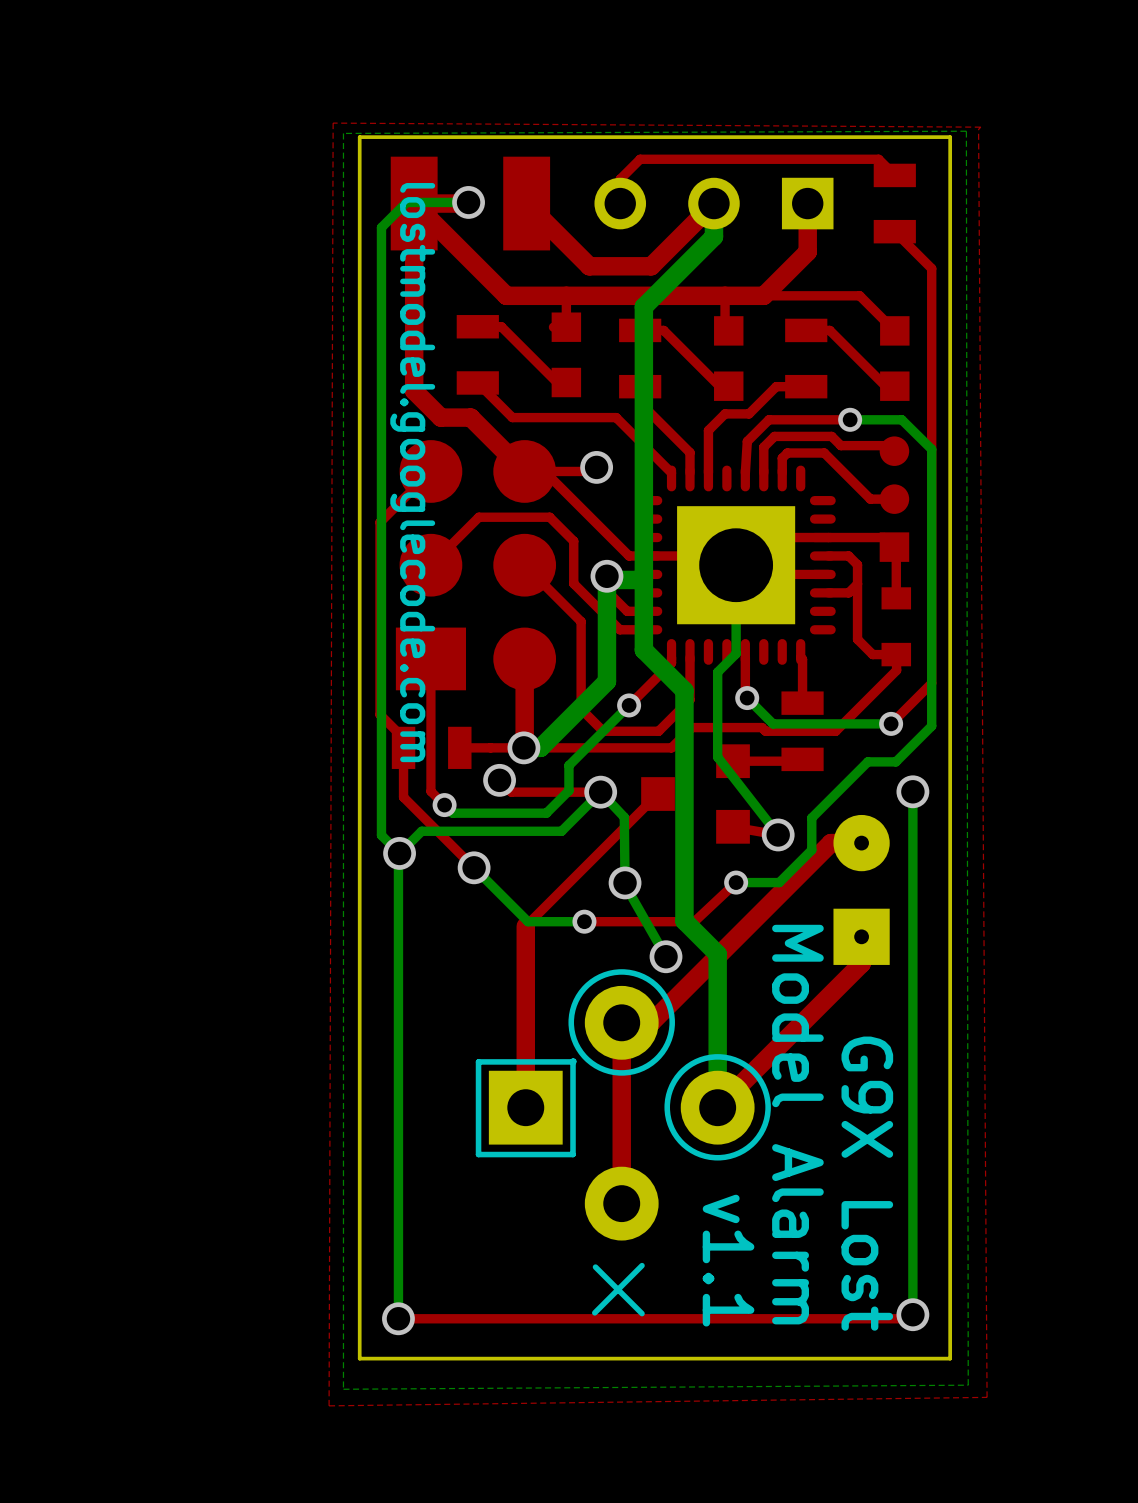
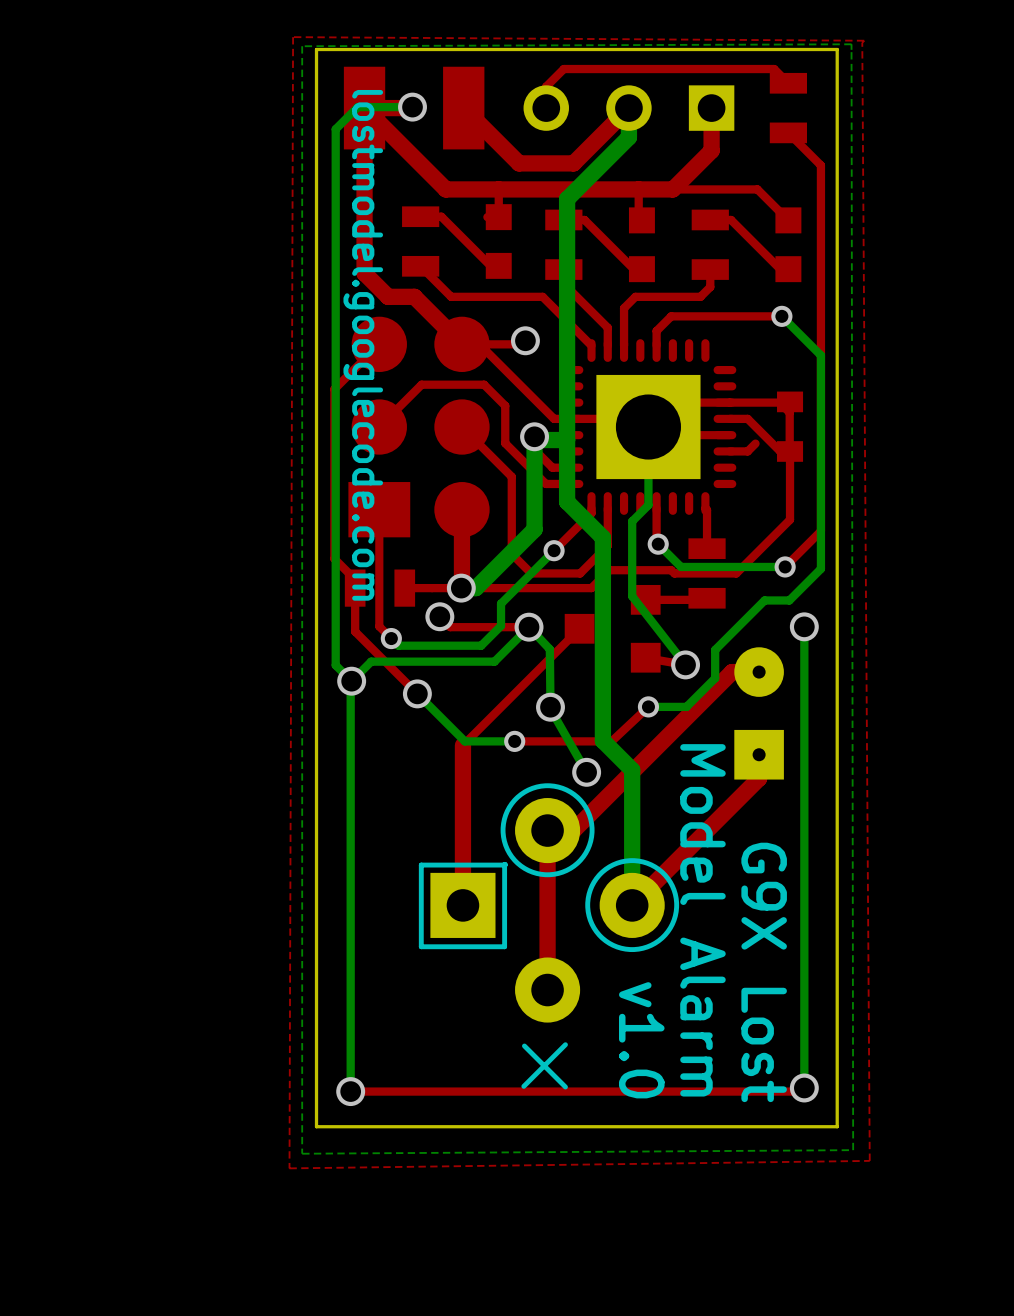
top track: (806, 386) (776, 386) (749, 413) (725, 413) (721, 417) -> (710, 269) (710, 287) (700, 296) (635, 296)
top track: (850, 419) (768, 419) (747, 441) (745, 472) -> (781, 316) (671, 316) (656, 331) (656, 345)
bottom track: (850, 419) (901, 419) (931, 449) (931, 484) -> (781, 316) (820, 355)
via position: (850, 419) -> (781, 316)
top track: (894, 451) (888, 445) (840, 445) (831, 436) (774, 436) (763, 447) (763, 472) -> none
top track: (782, 472) (782, 458) (787, 453) (824, 453) (870, 499) (894, 499) -> none
part: (894, 499) -> none
top track: (857, 564) (857, 639) (872, 654) (896, 654) (896, 670) -> (755, 426) (780, 451) (790, 451) (790, 519)
part position: (896, 626) -> (790, 426)
text: v1.1 (728, 1260) -> v1.0 (641, 1040)

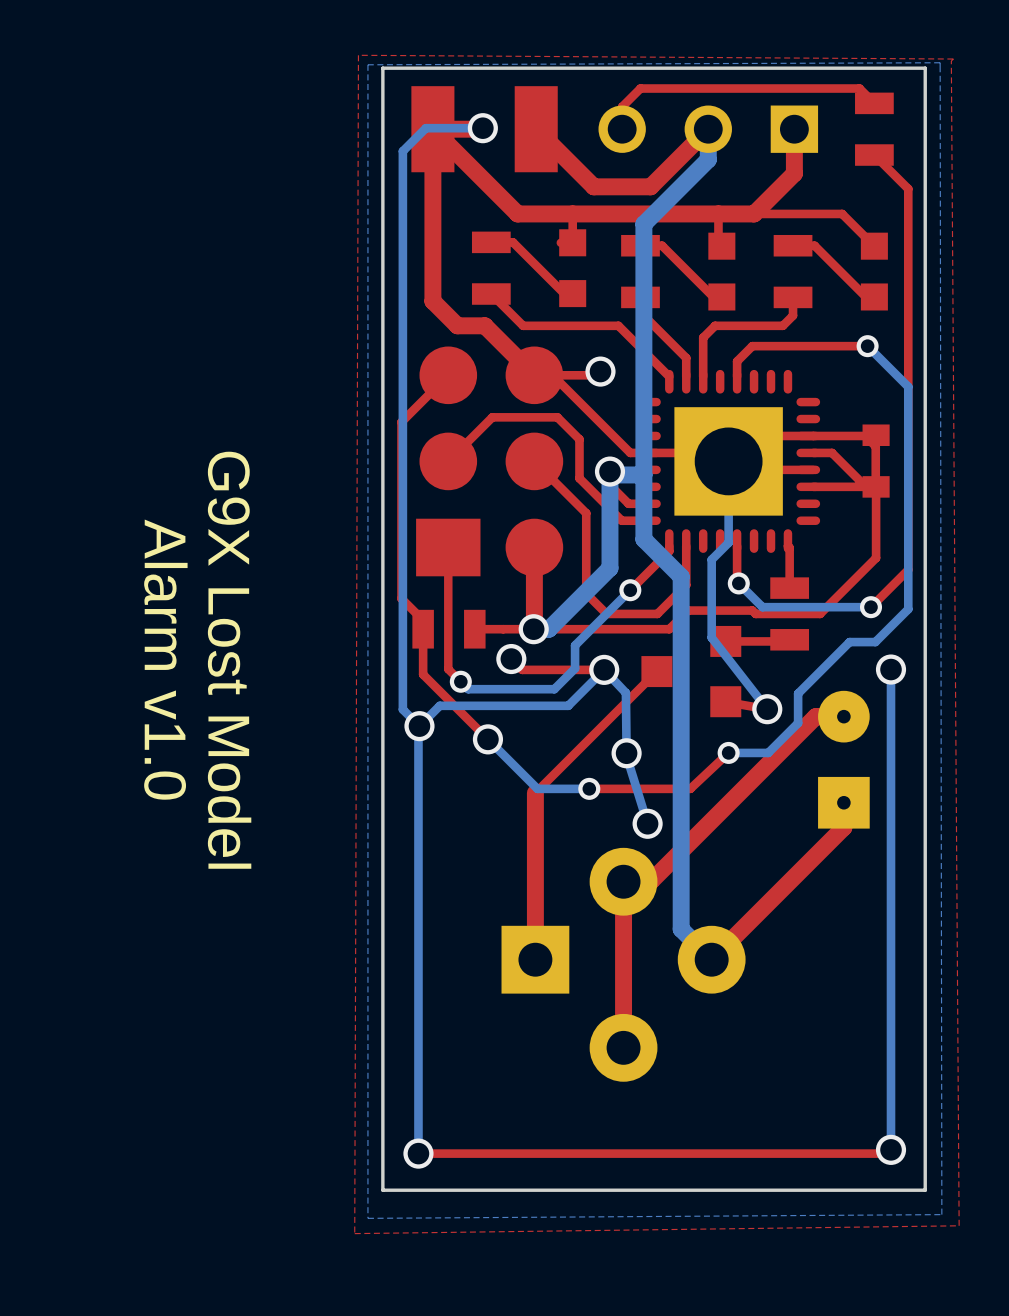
text: lostmodel.googlecode.com (363, 345) -> none
top track: (755, 443) (747, 451) -> (876, 486) (832, 486)
text: none -> Alarm v1.0 (165, 659)
text: none -> G9X Lost Model (229, 660)
bottom track: (549, 707) (586, 772) -> (625, 753) (647, 823)
bottom track: (602, 740) (632, 770) (632, 905) -> (681, 788) (681, 929) (711, 959)
via position: (586, 772) -> (647, 823)
drawing: [500, 783, 680, 953] -> none
line: (504, 864) (504, 946) (421, 946) (421, 865) (505, 865) -> none
text: Model Alarm (702, 920) -> none
text: G9X Lost (764, 972) -> none
text: v1.0 (641, 1040) -> none
line: (565, 1044) (523, 1086) -> none
line: (524, 1046) (565, 1087) -> none

